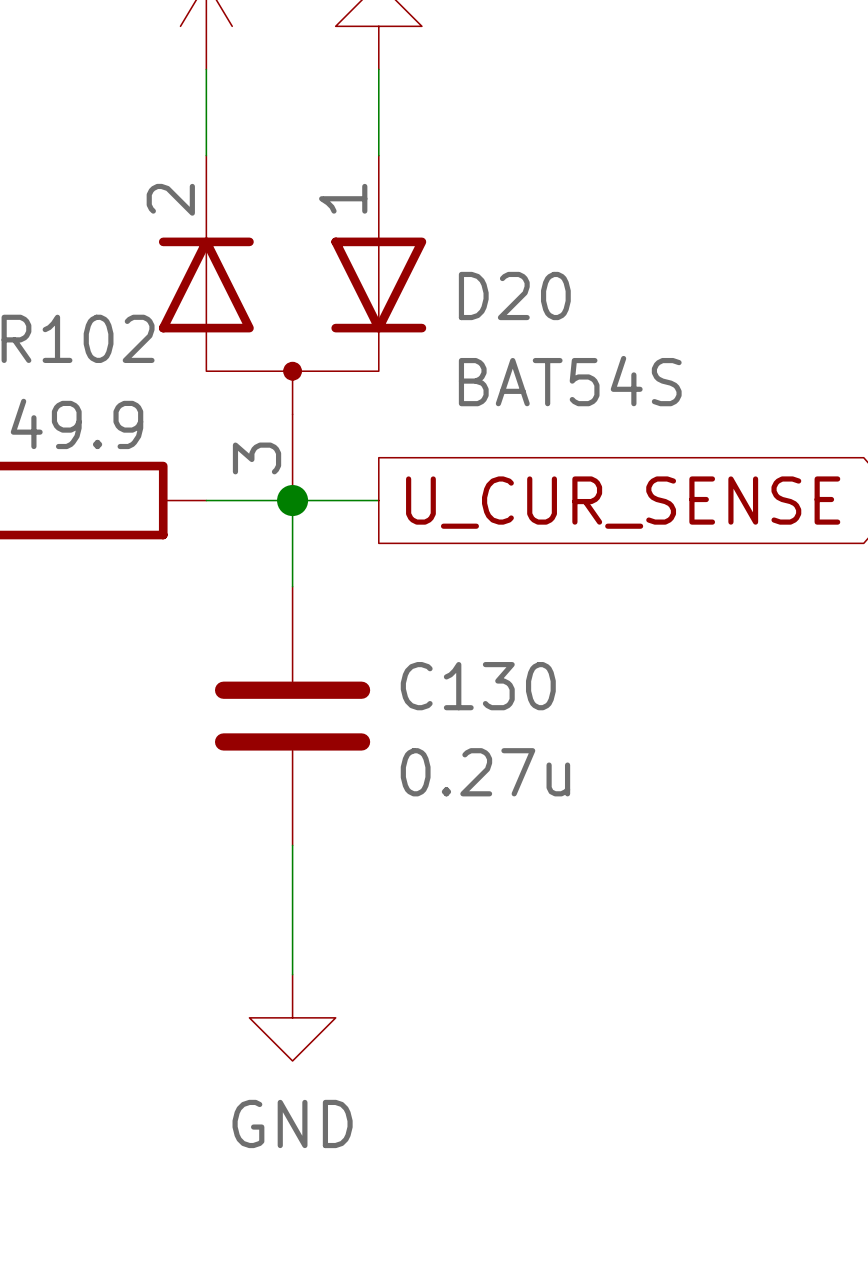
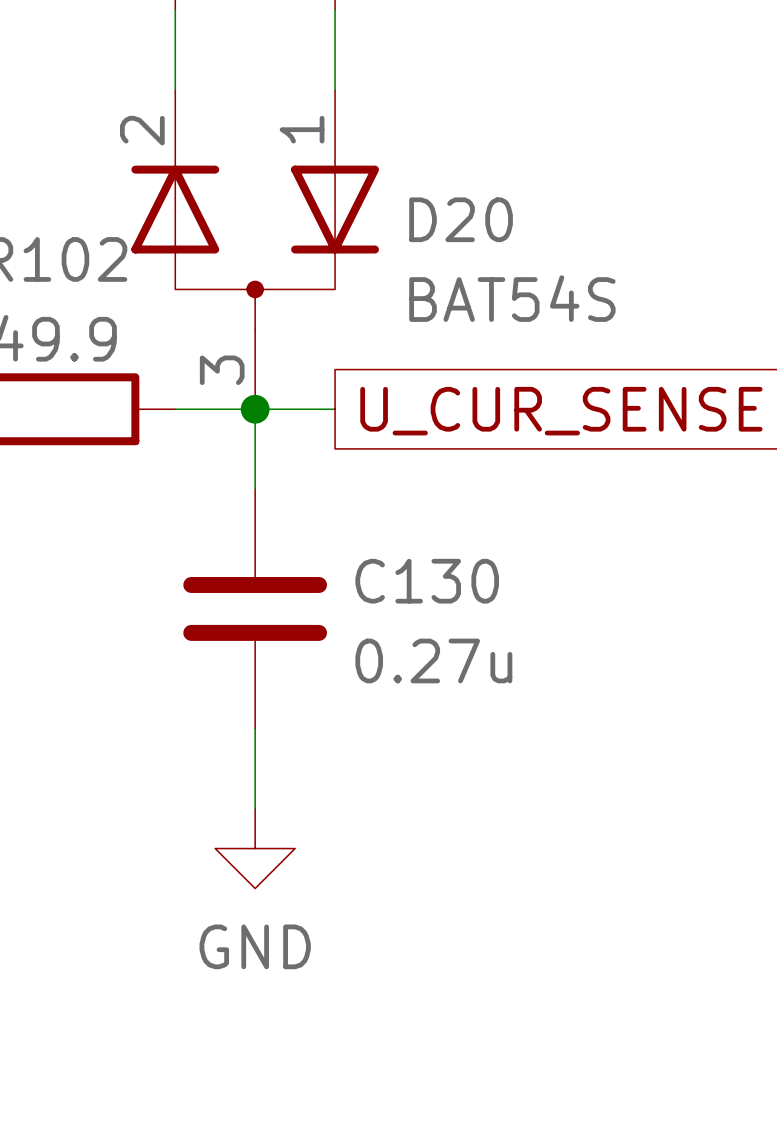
power symbol position: GND (292, 1017) -> GND (255, 848)

